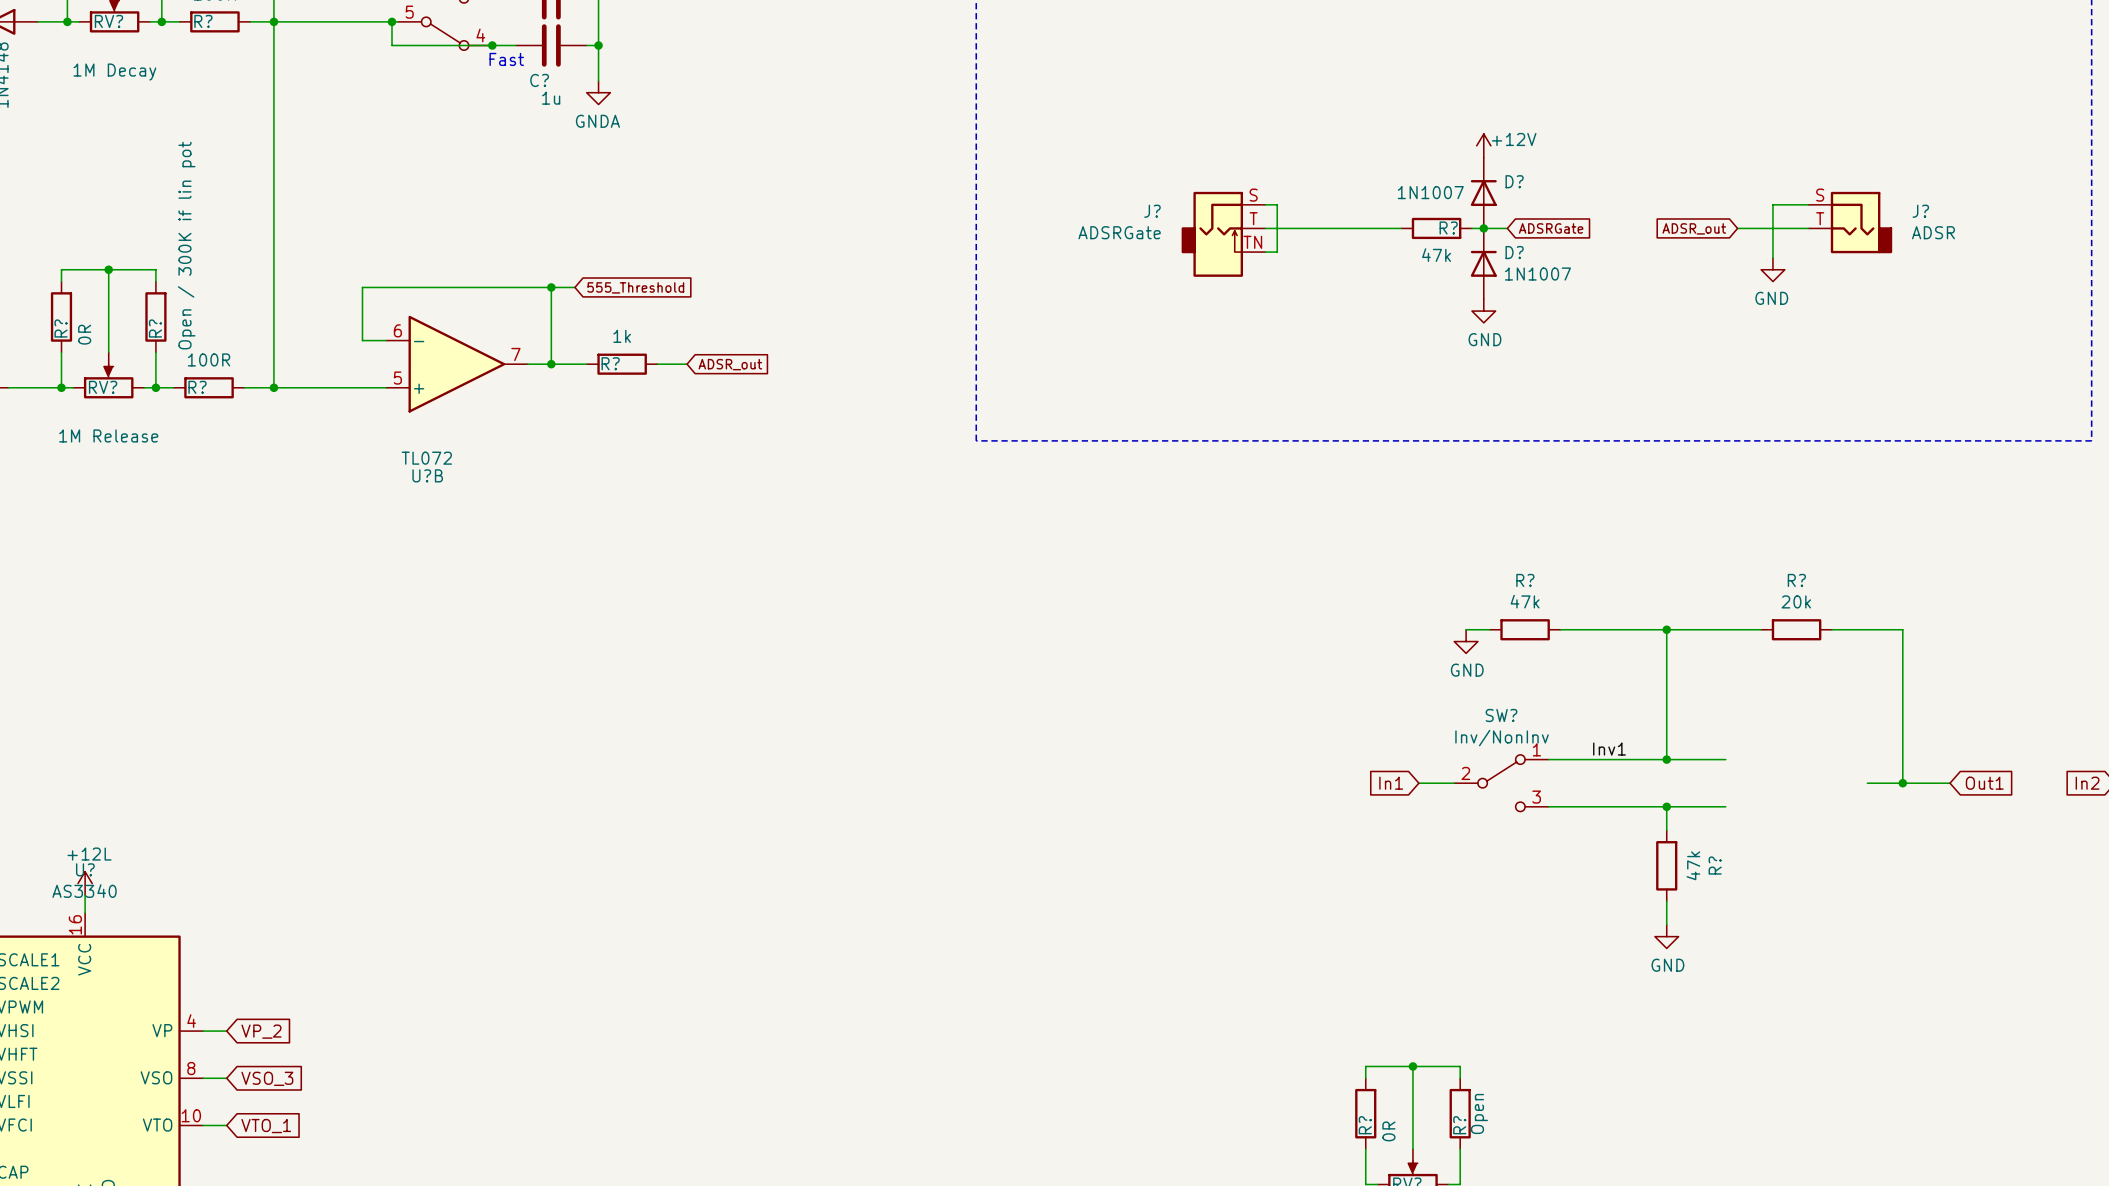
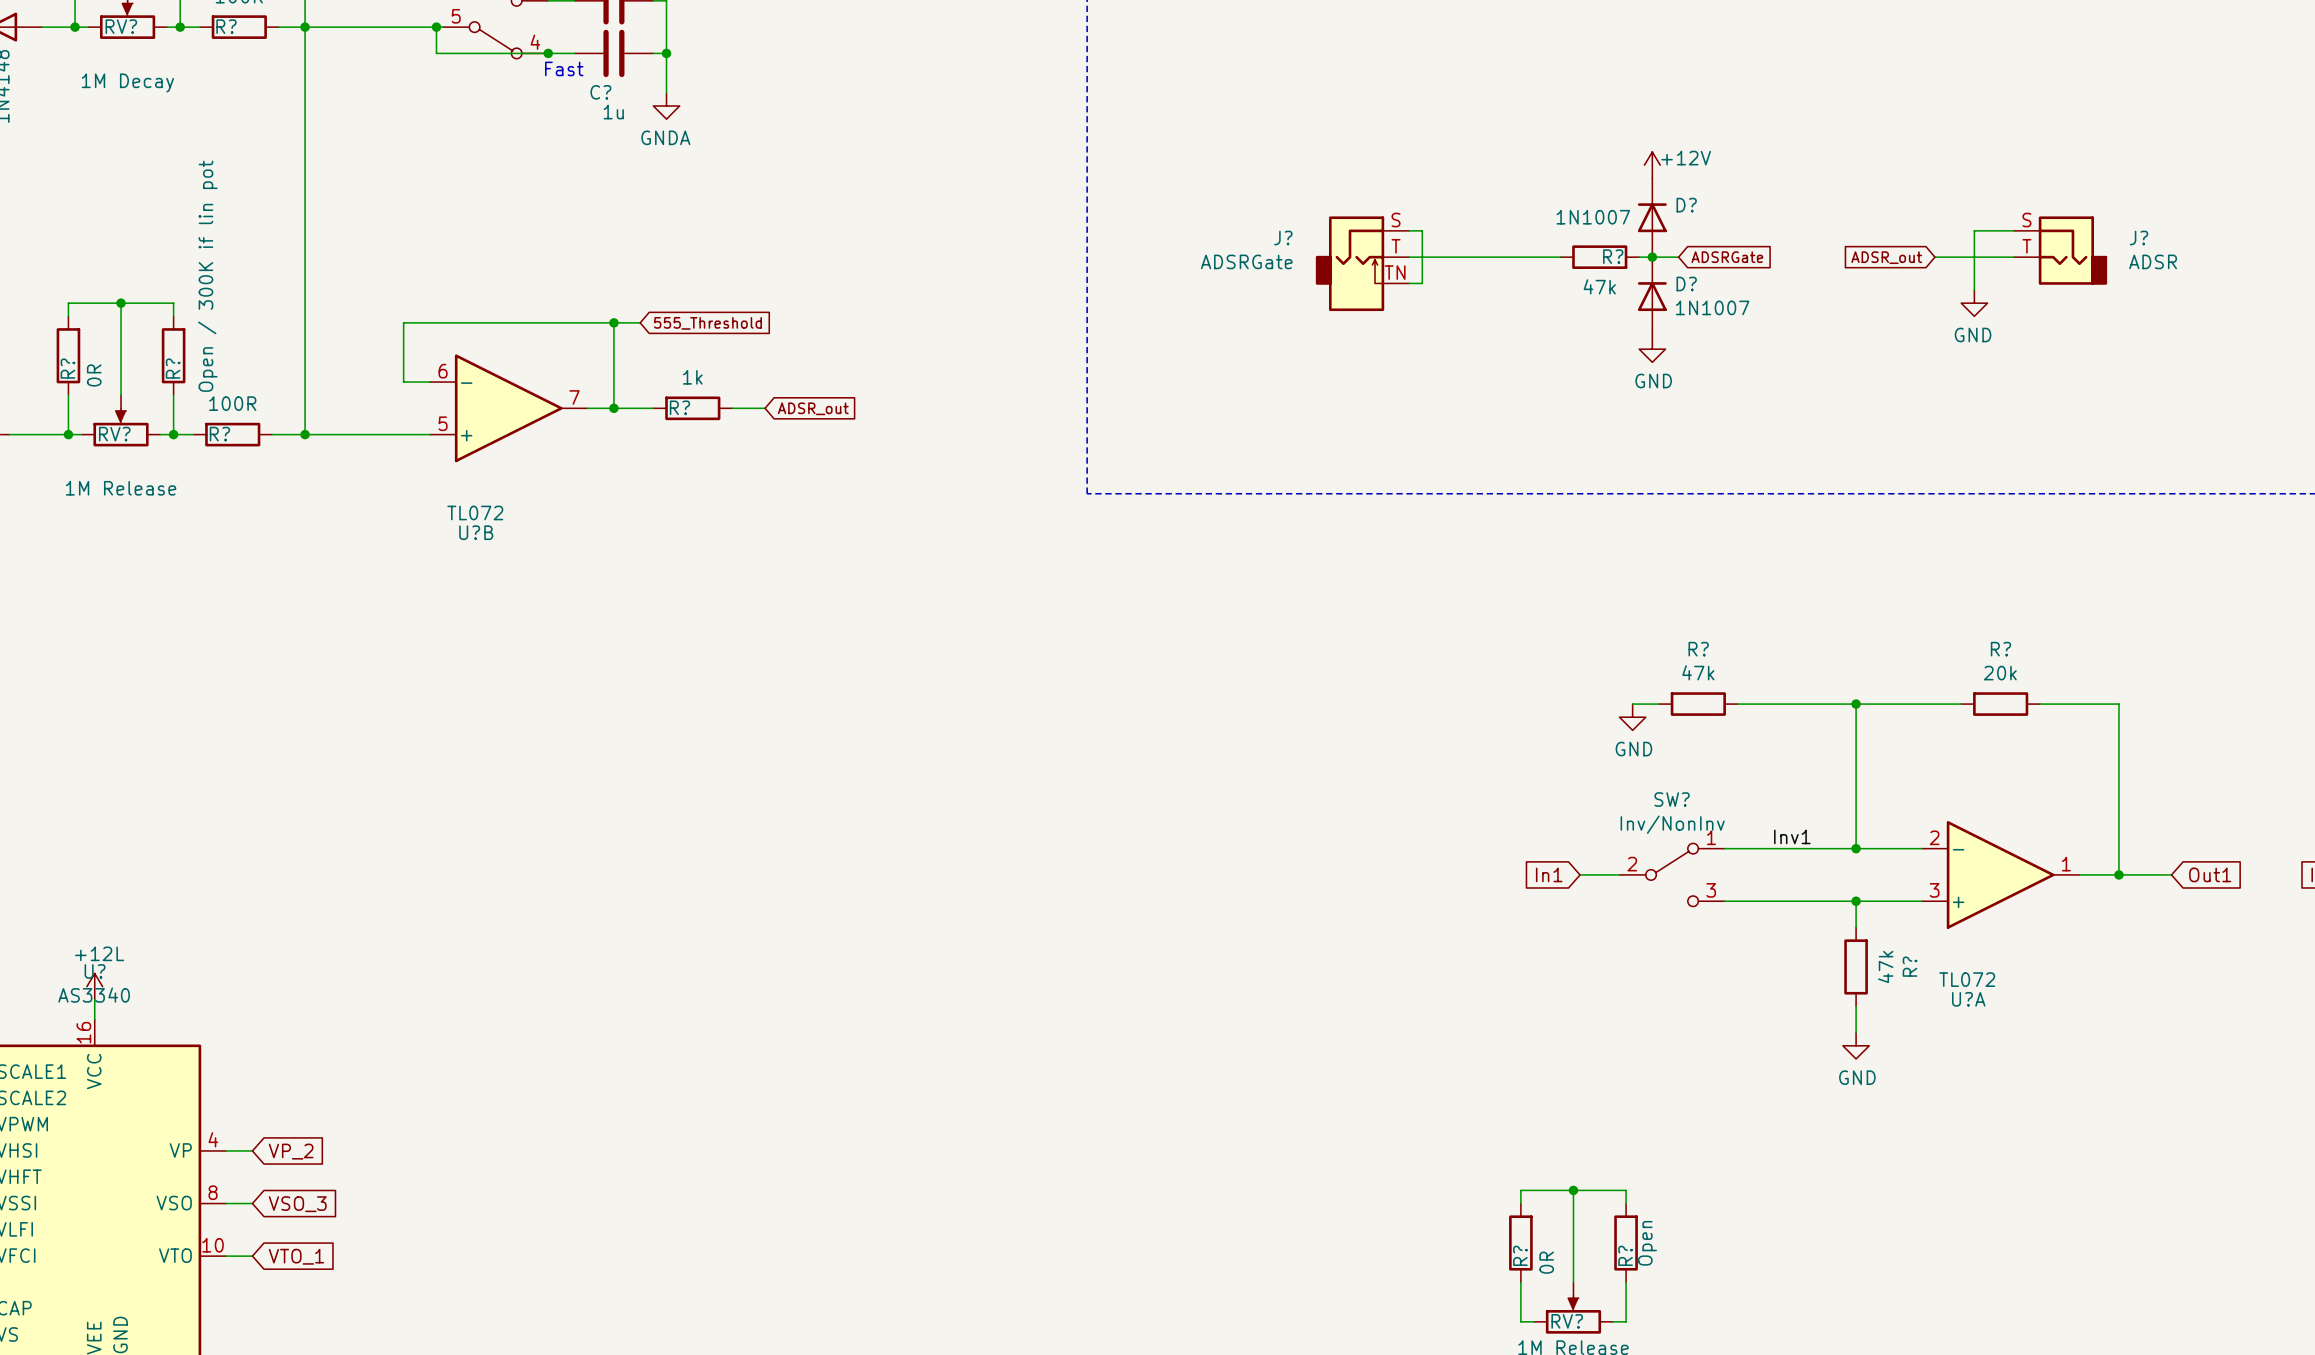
U?A: none -> TL072 (2000, 874)

